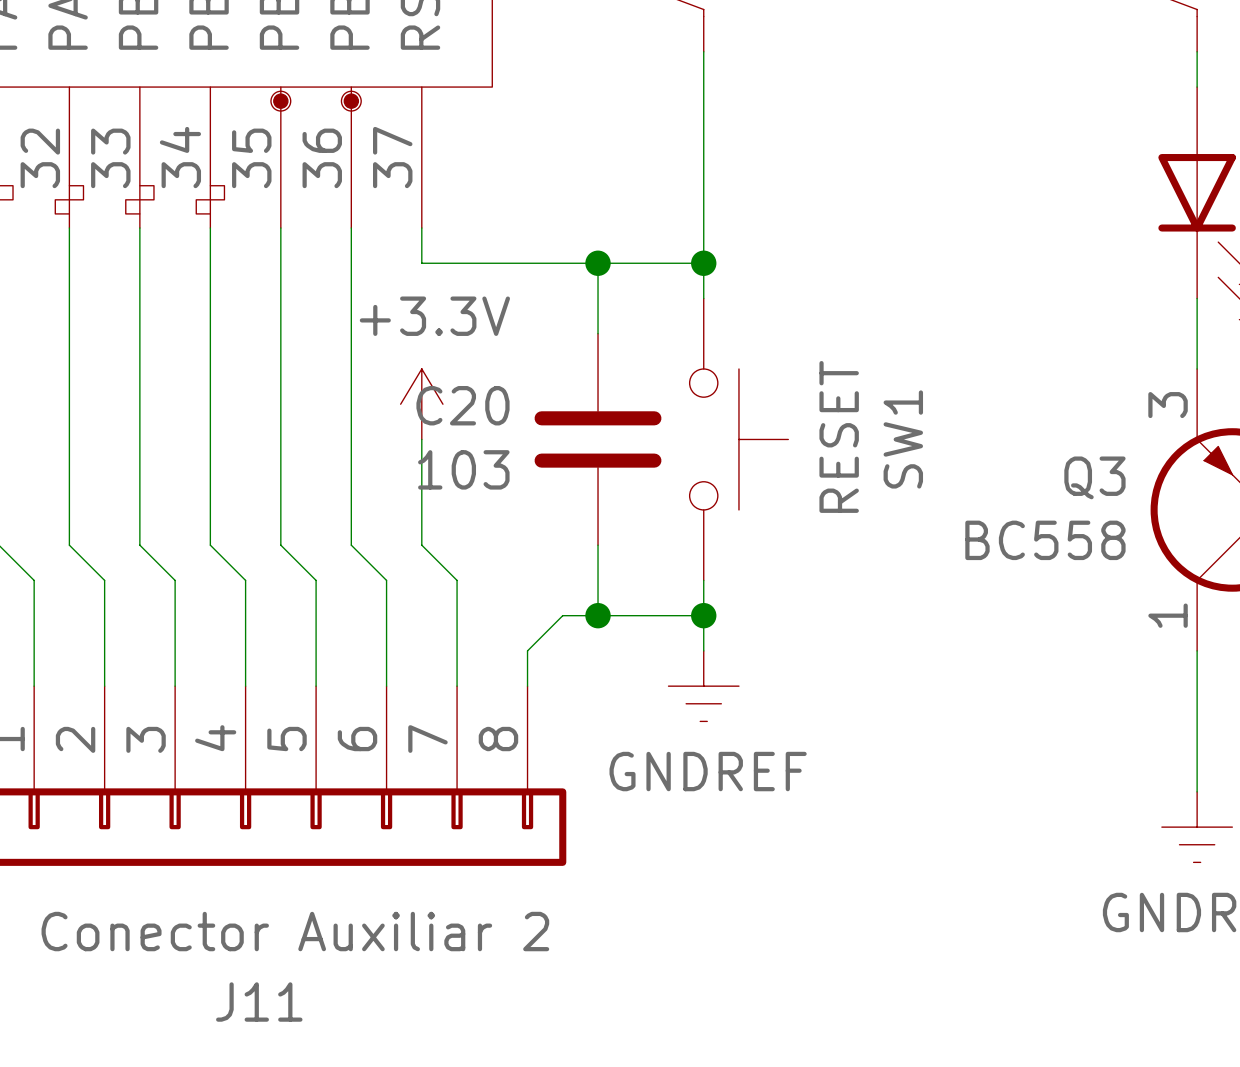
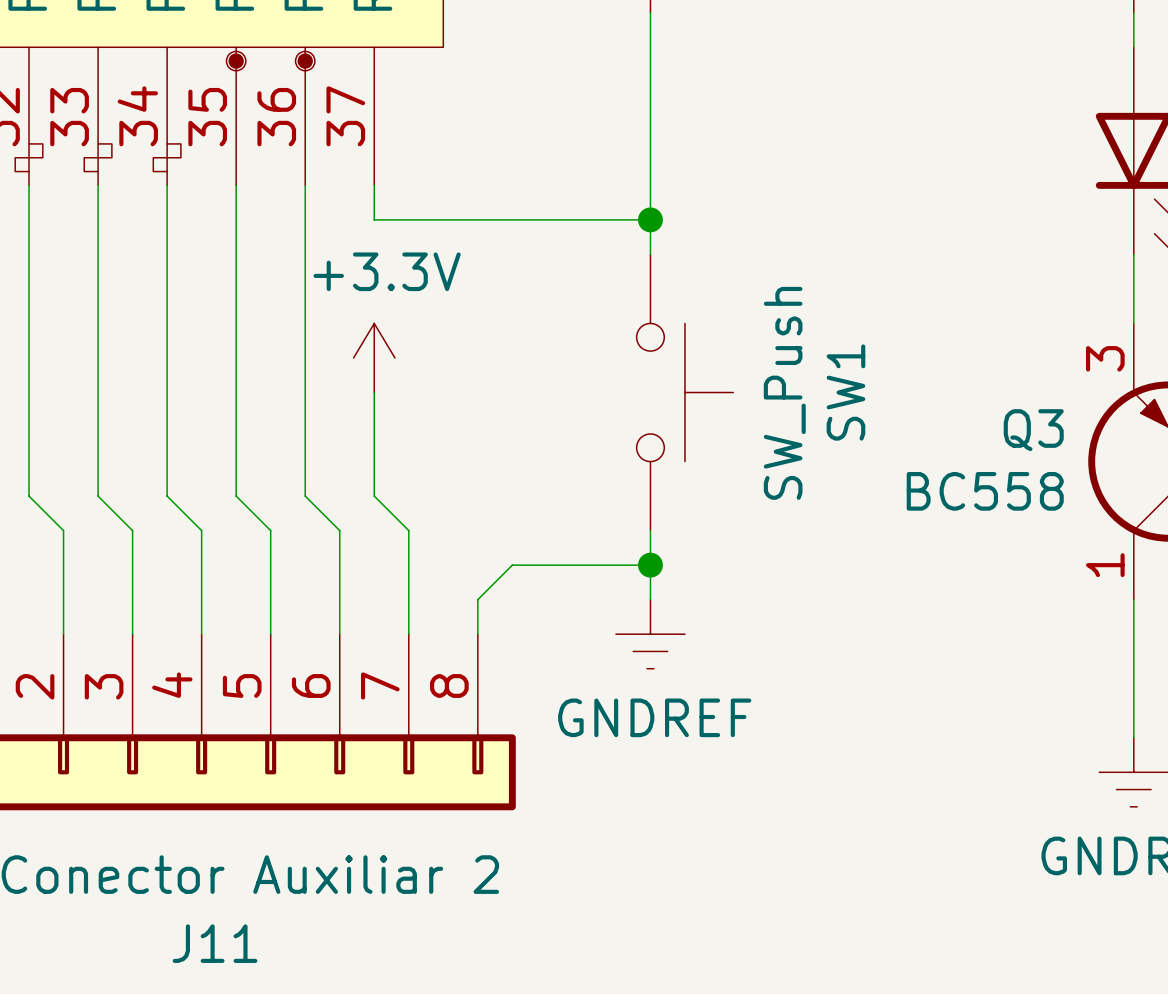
wire: (598, 263) (598, 333) -> none
junction: (598, 263) -> none
SW1 value: RESET (839, 436) -> SW_Push (784, 393)
C20: 103 (598, 439) -> none
wire: (598, 545) (598, 615) -> none
junction: (598, 615) -> none

